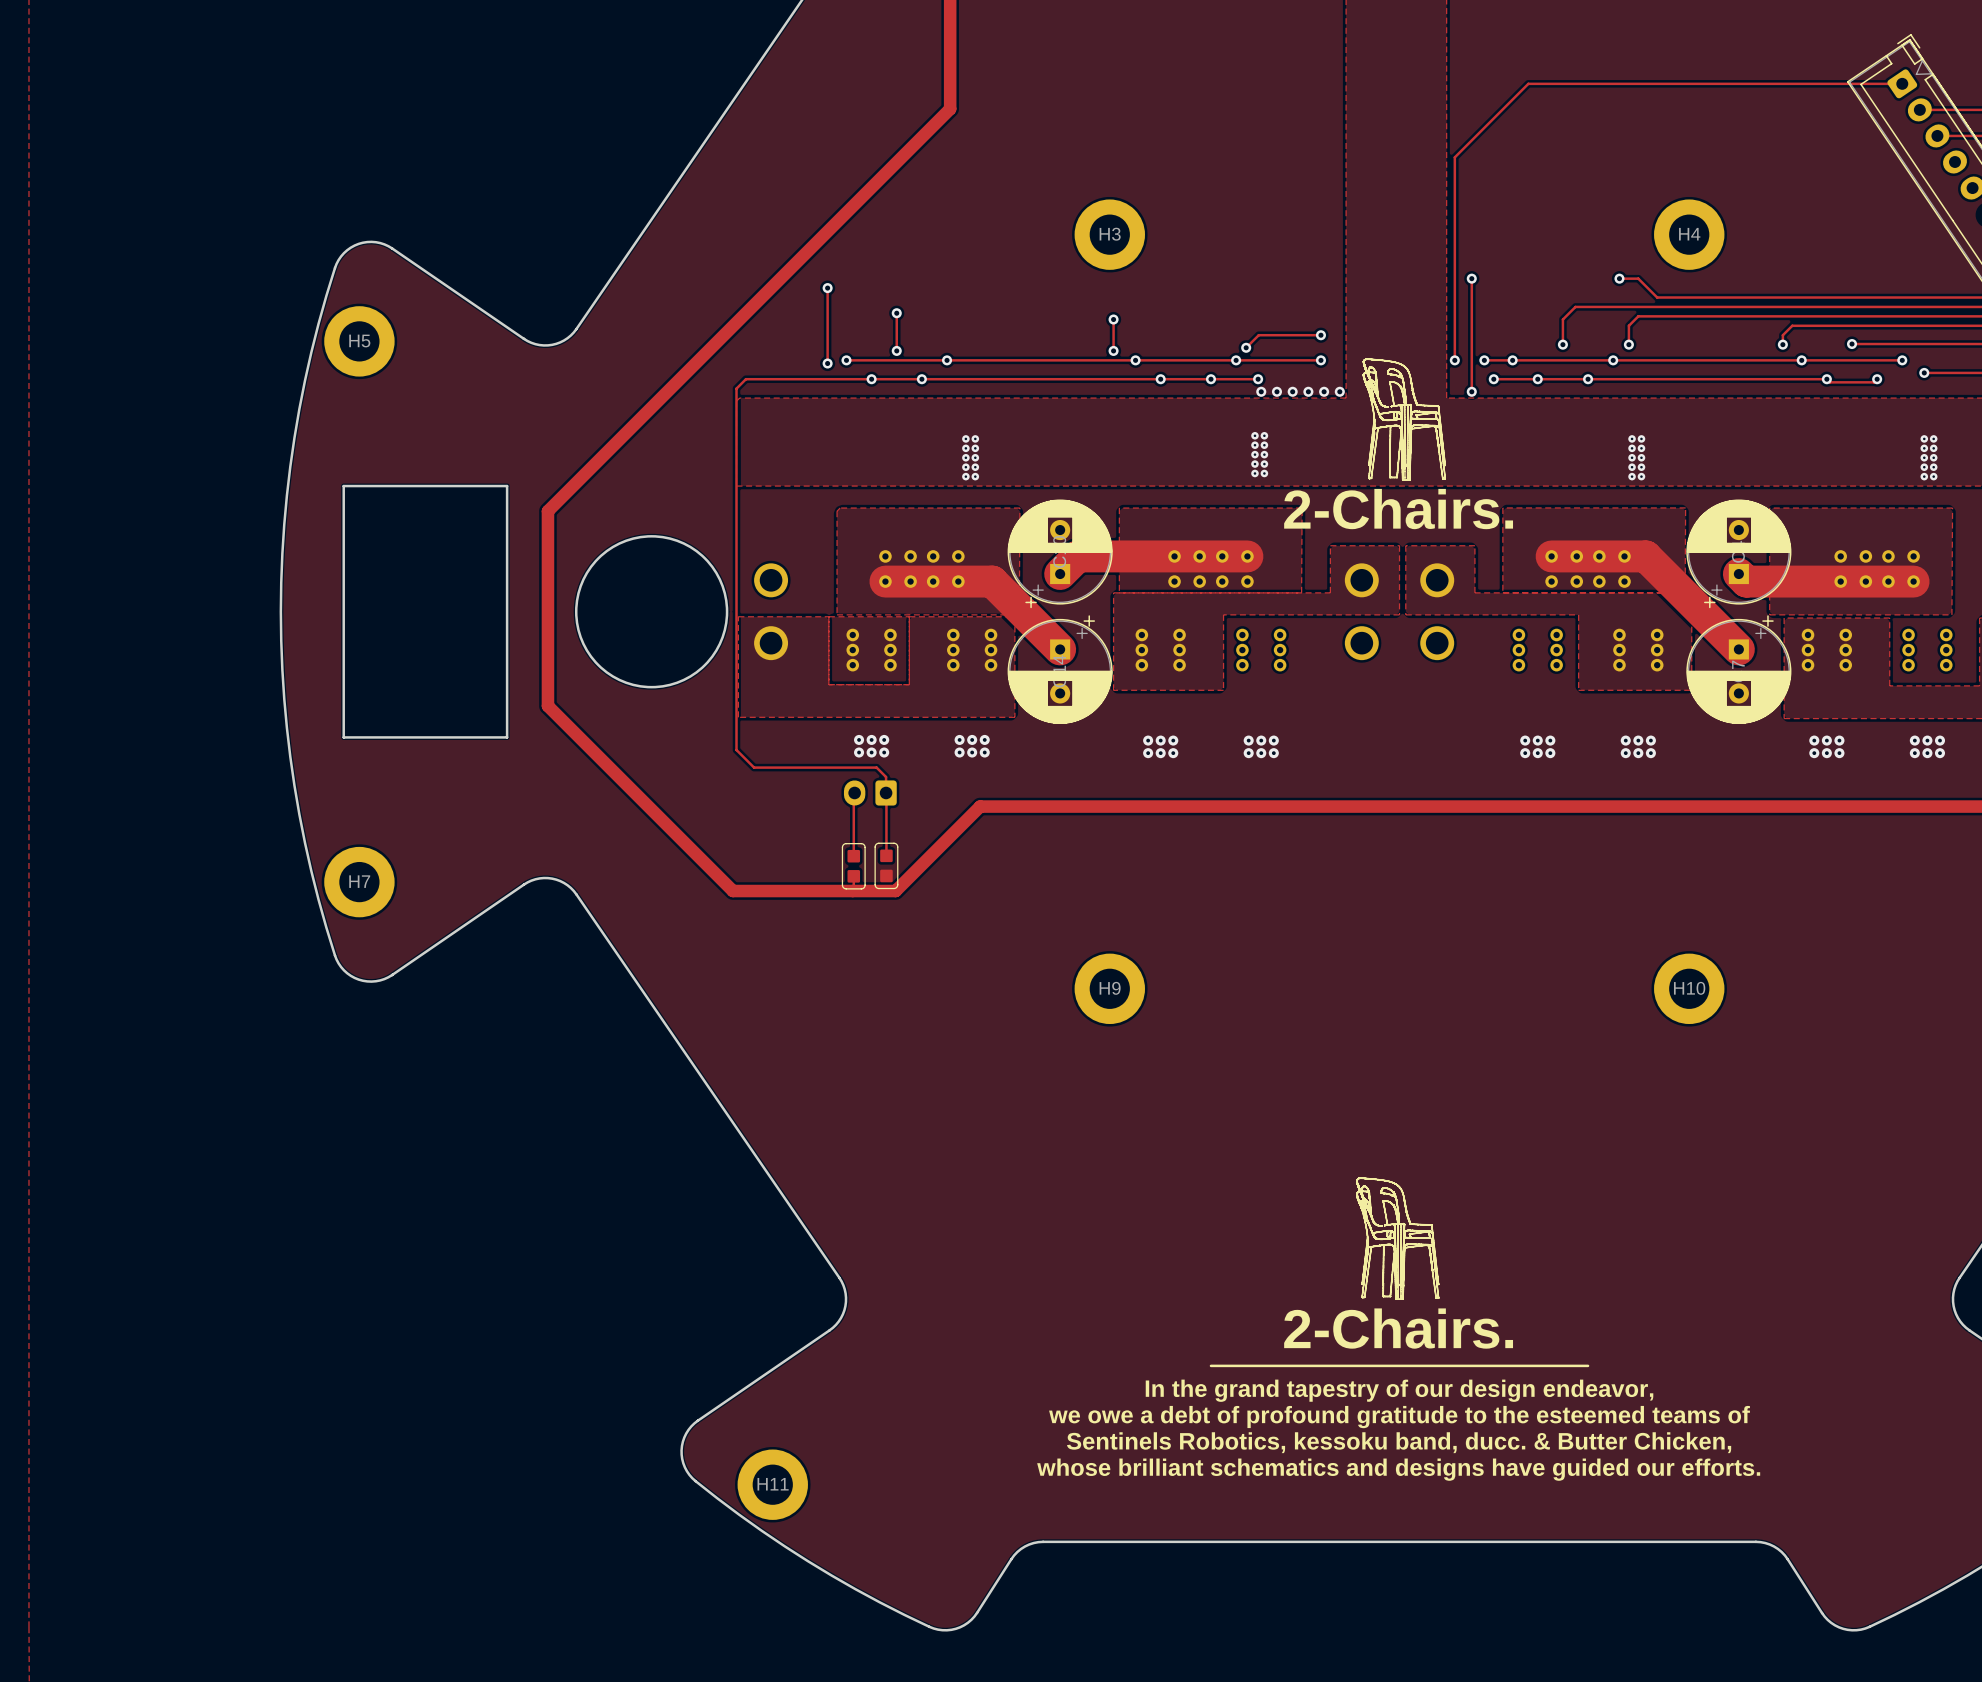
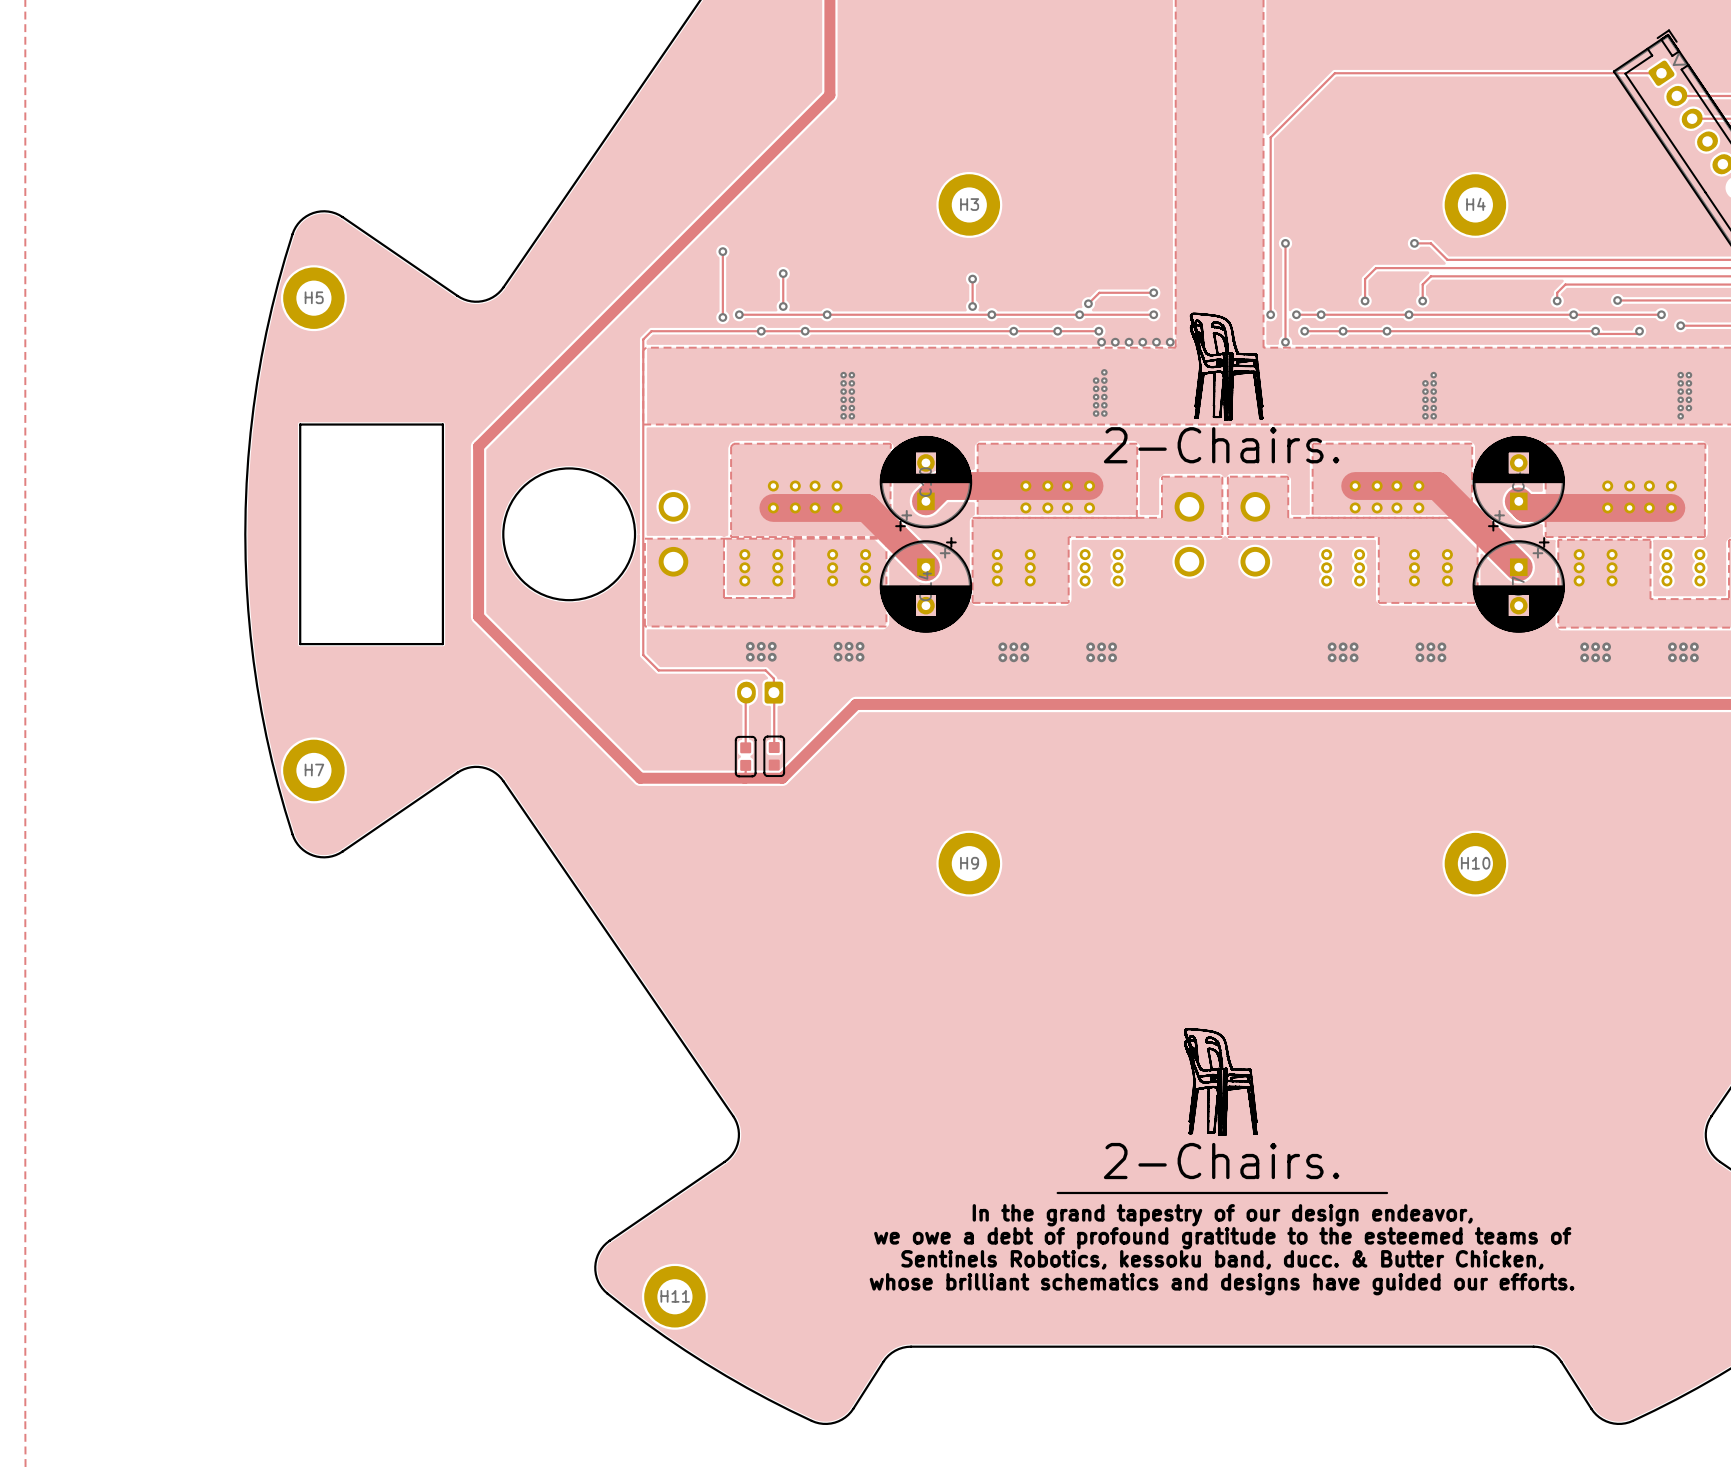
via: none -> (1104, 372)
via: none -> (843, 375)
via: none -> (851, 375)
via: none -> (1433, 375)
via: none -> (1680, 375)
via: none -> (1688, 375)
via: (1933, 476) -> none

